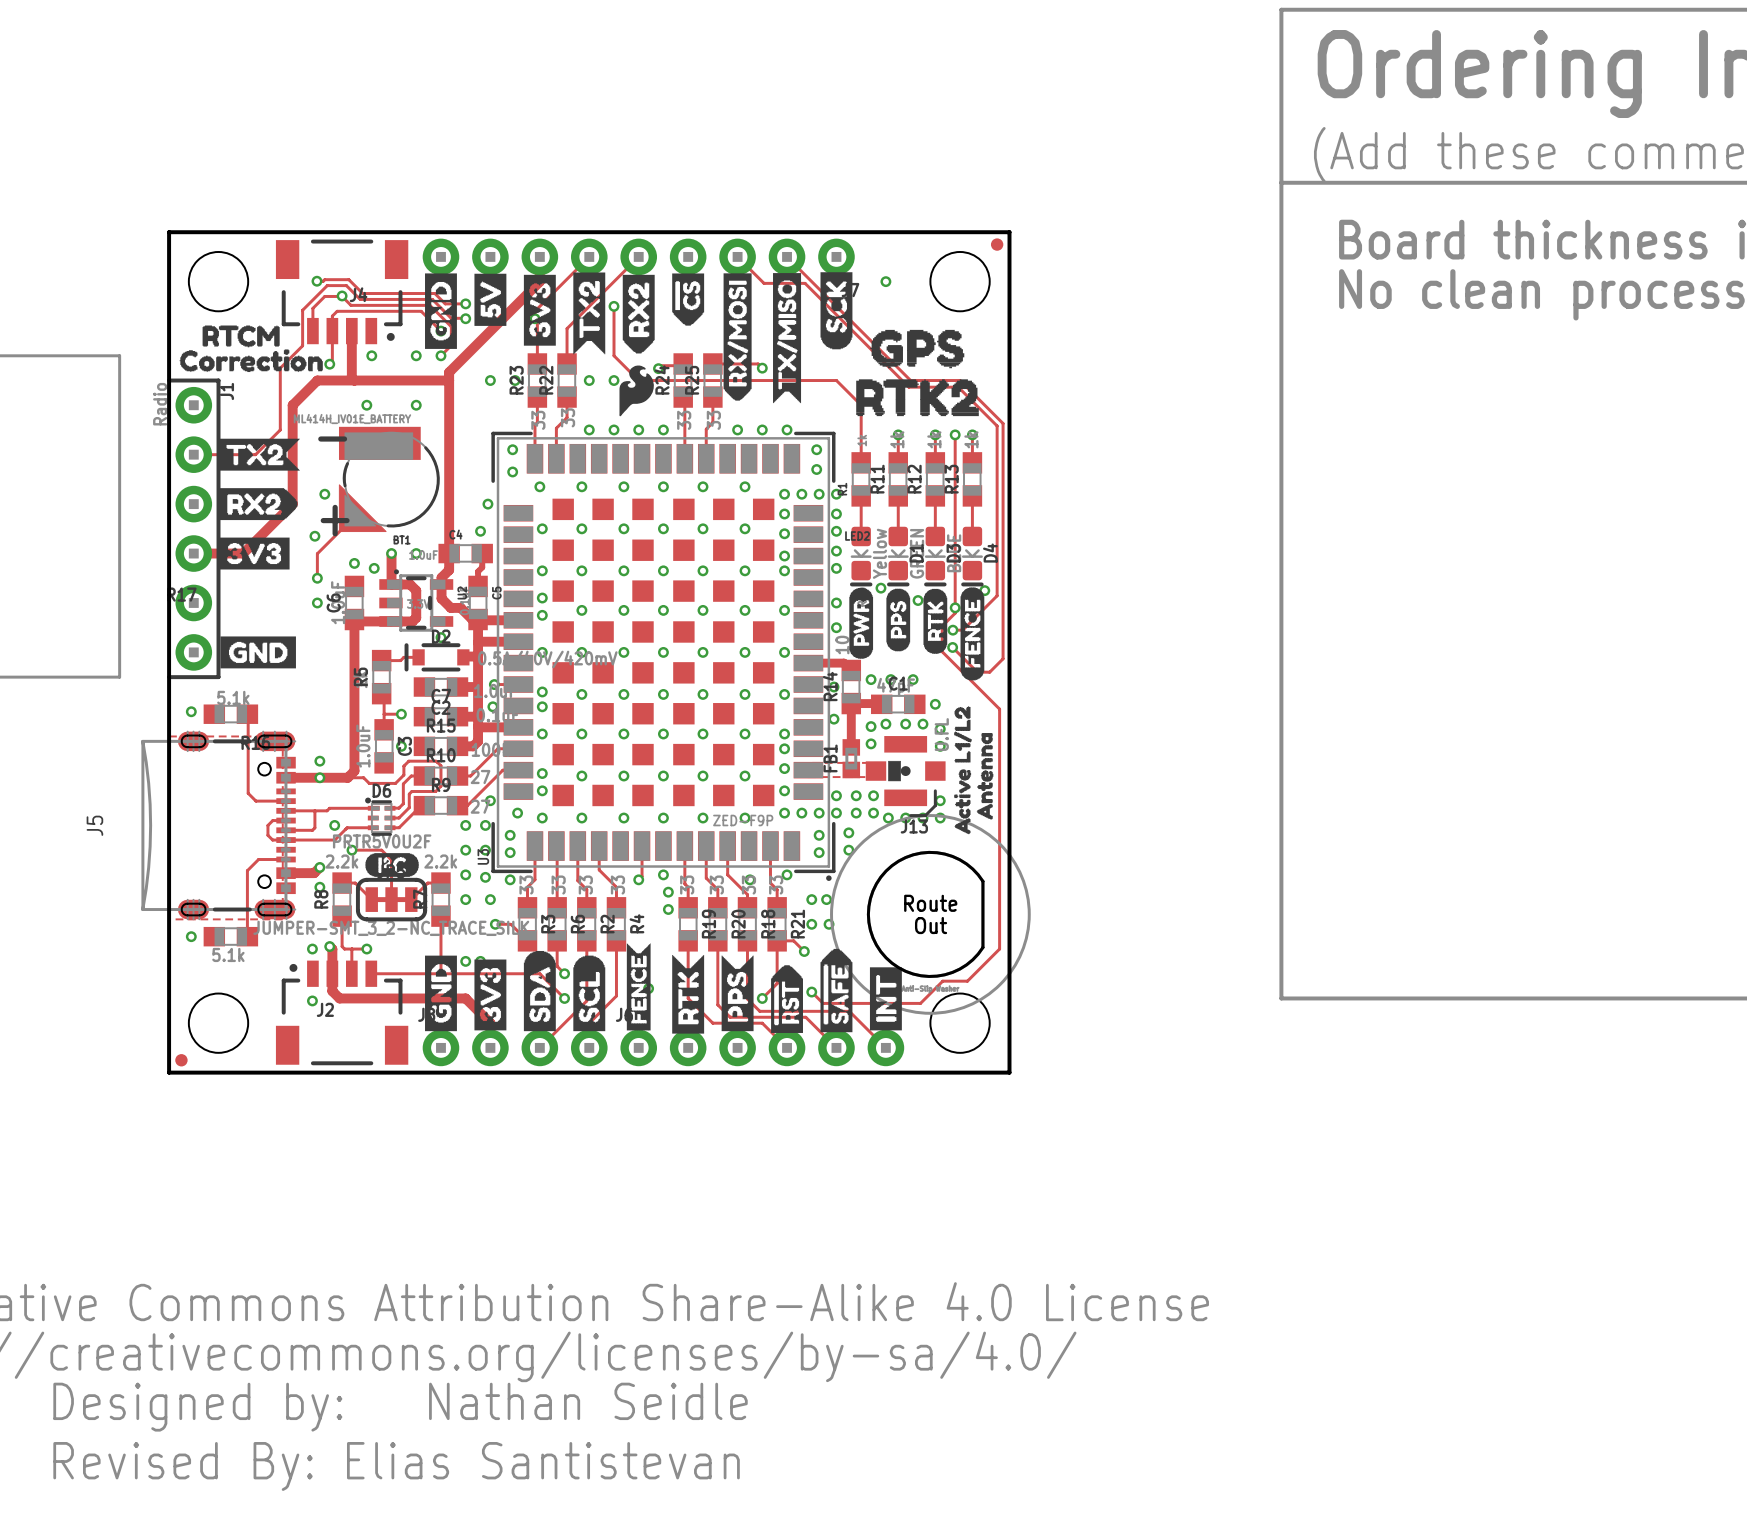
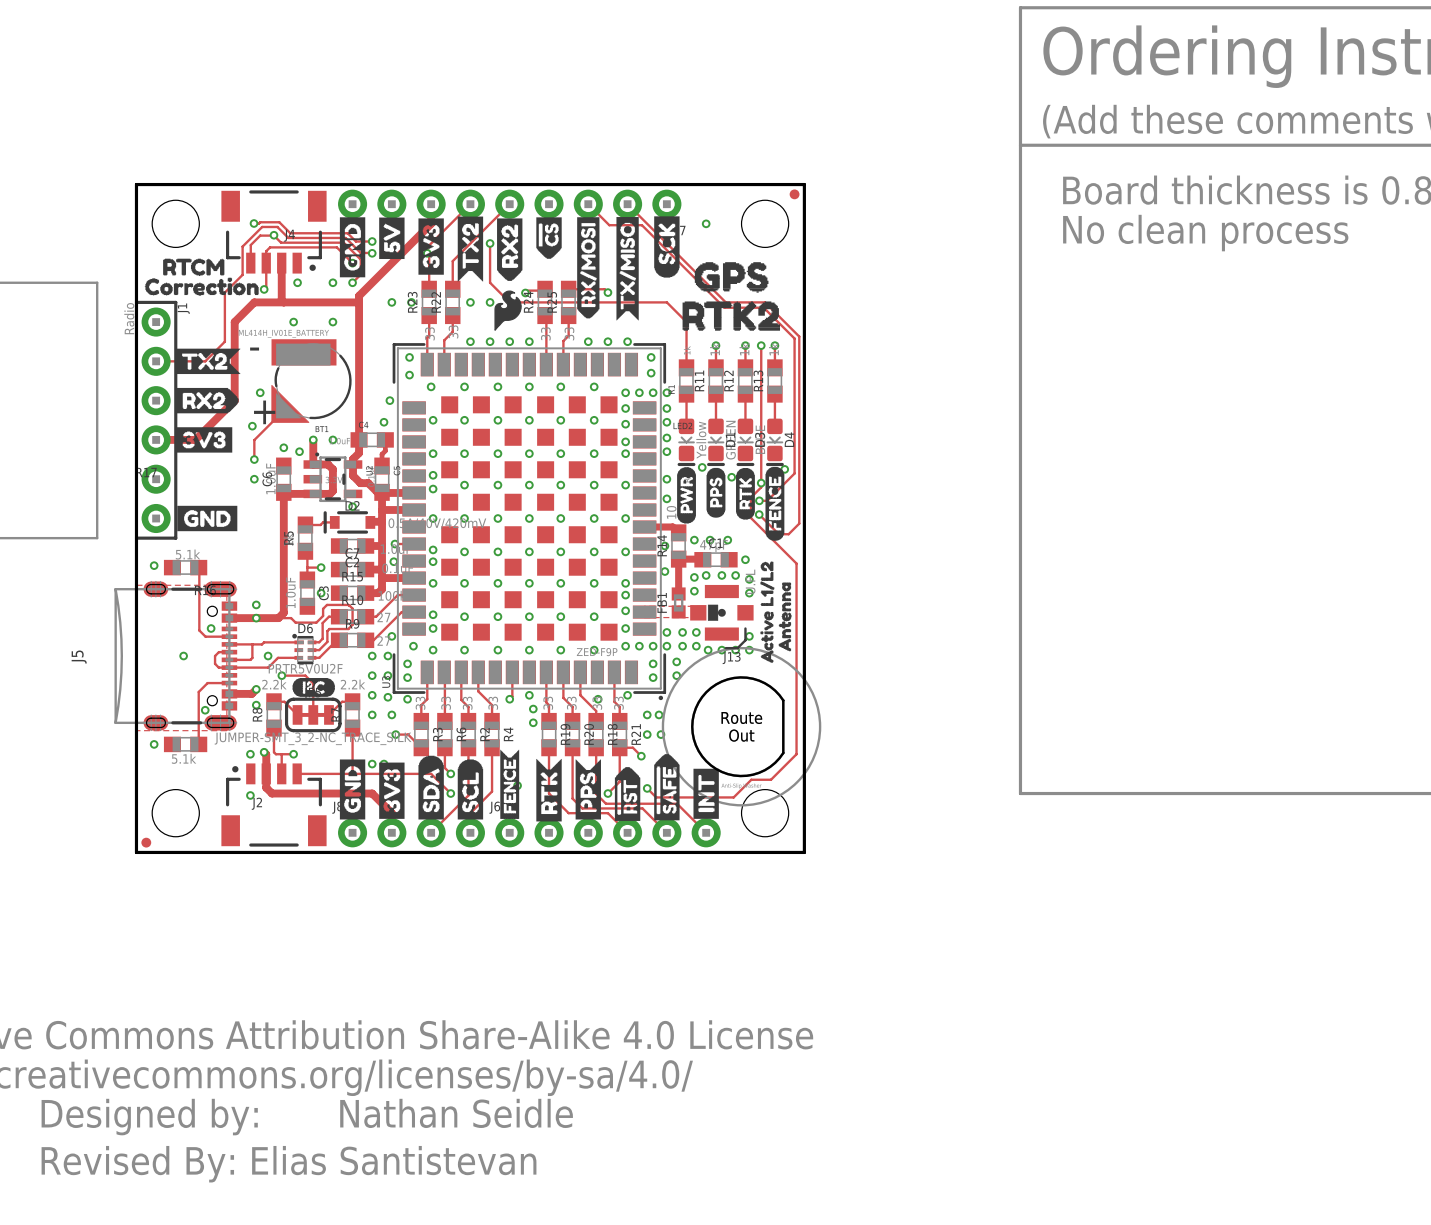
via: none -> (211, 628)
via: none -> (183, 656)
via: none -> (205, 710)

